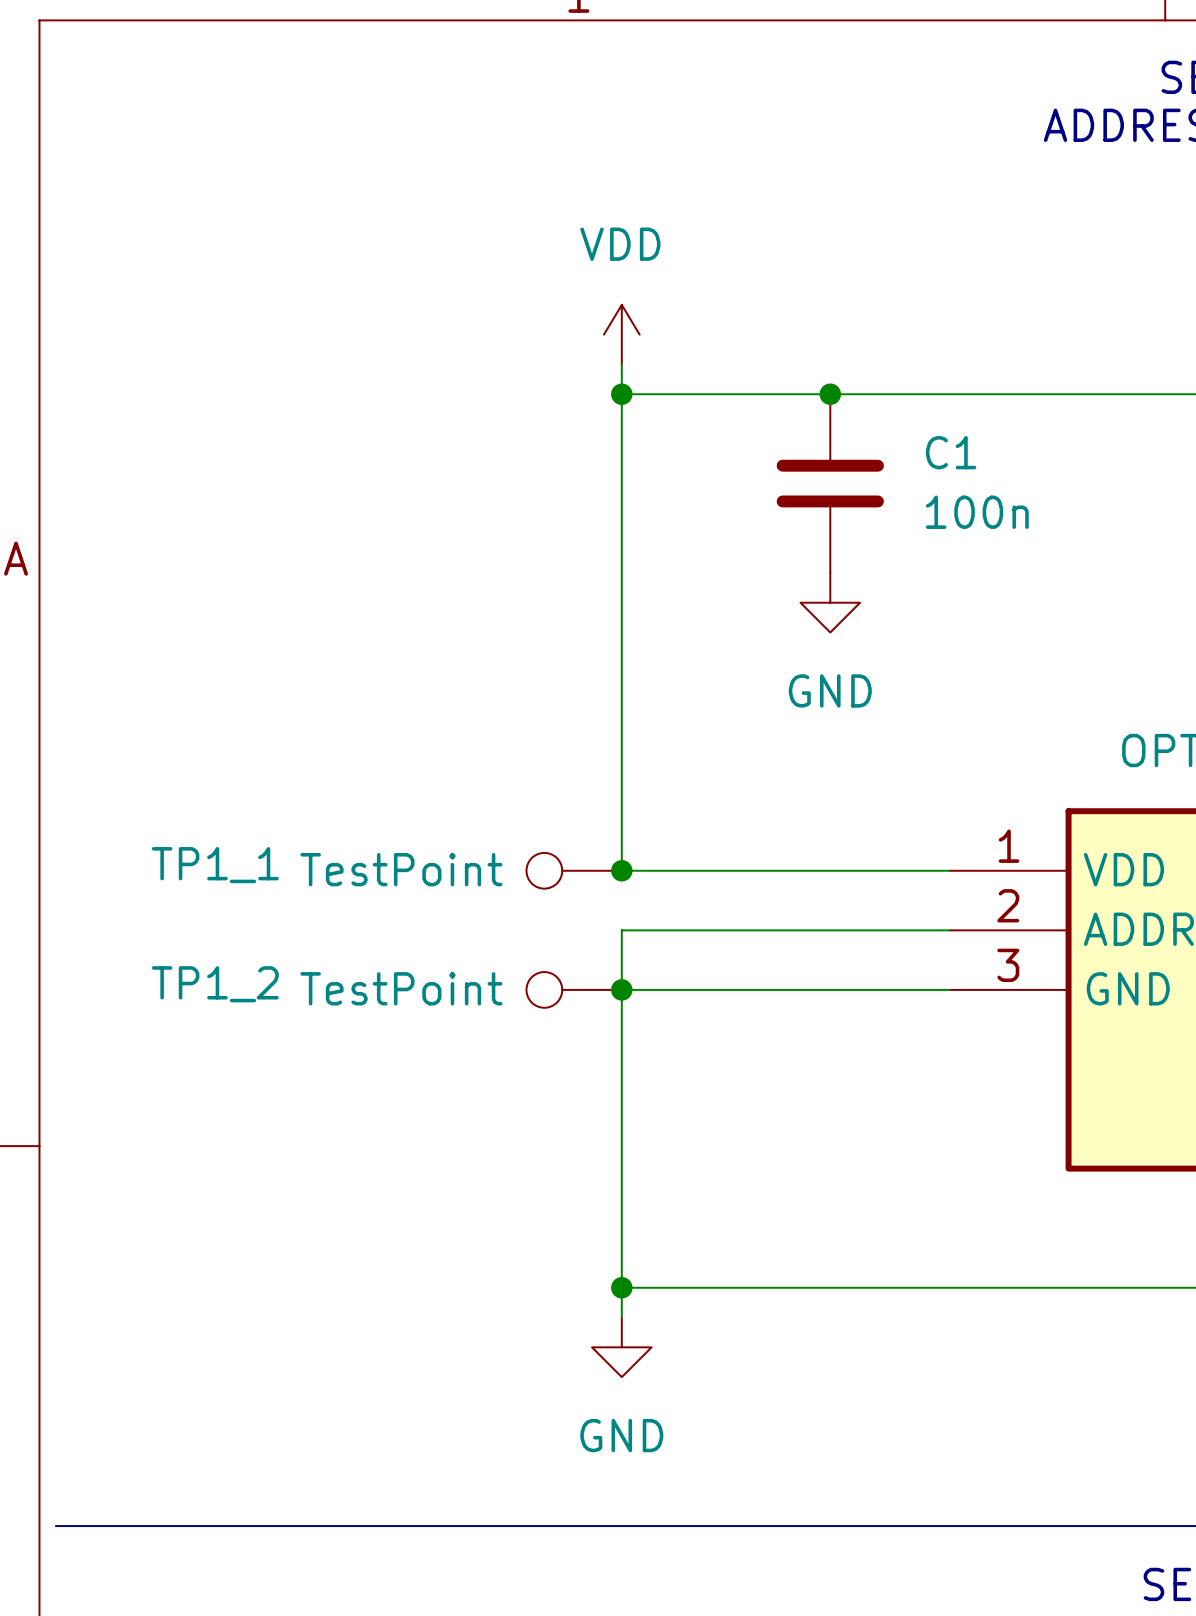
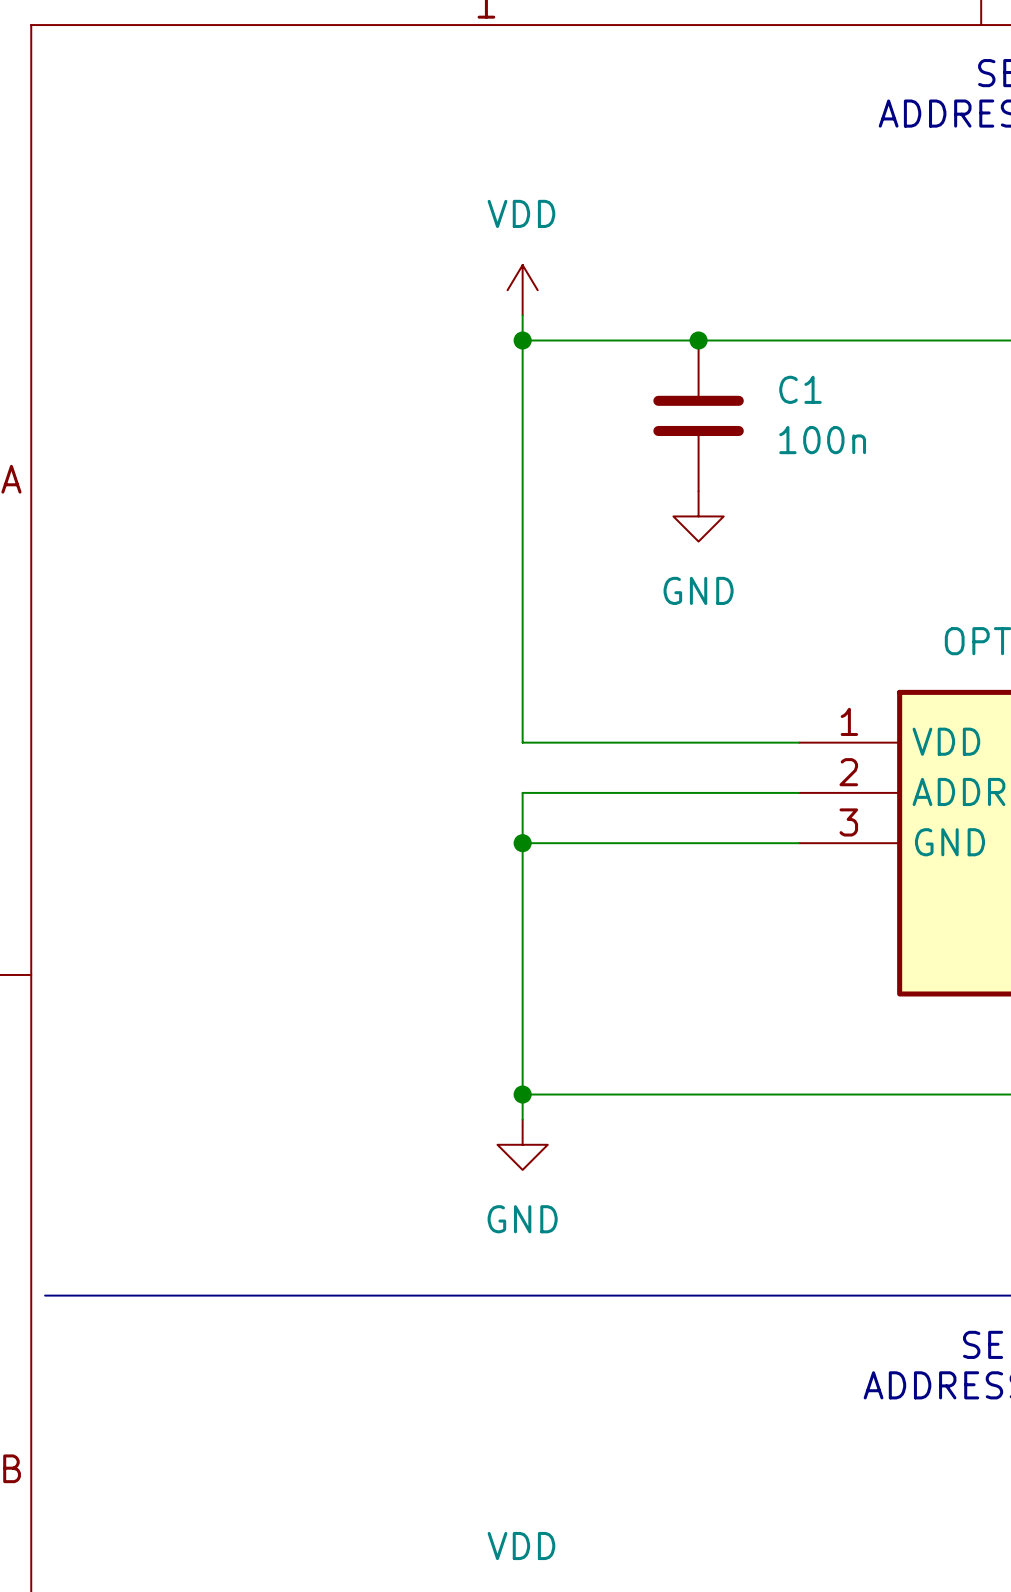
TP1_1: TestPoint (574, 870) -> none
junction: (621, 870) -> none
TP1_2: TestPoint (574, 989) -> none

